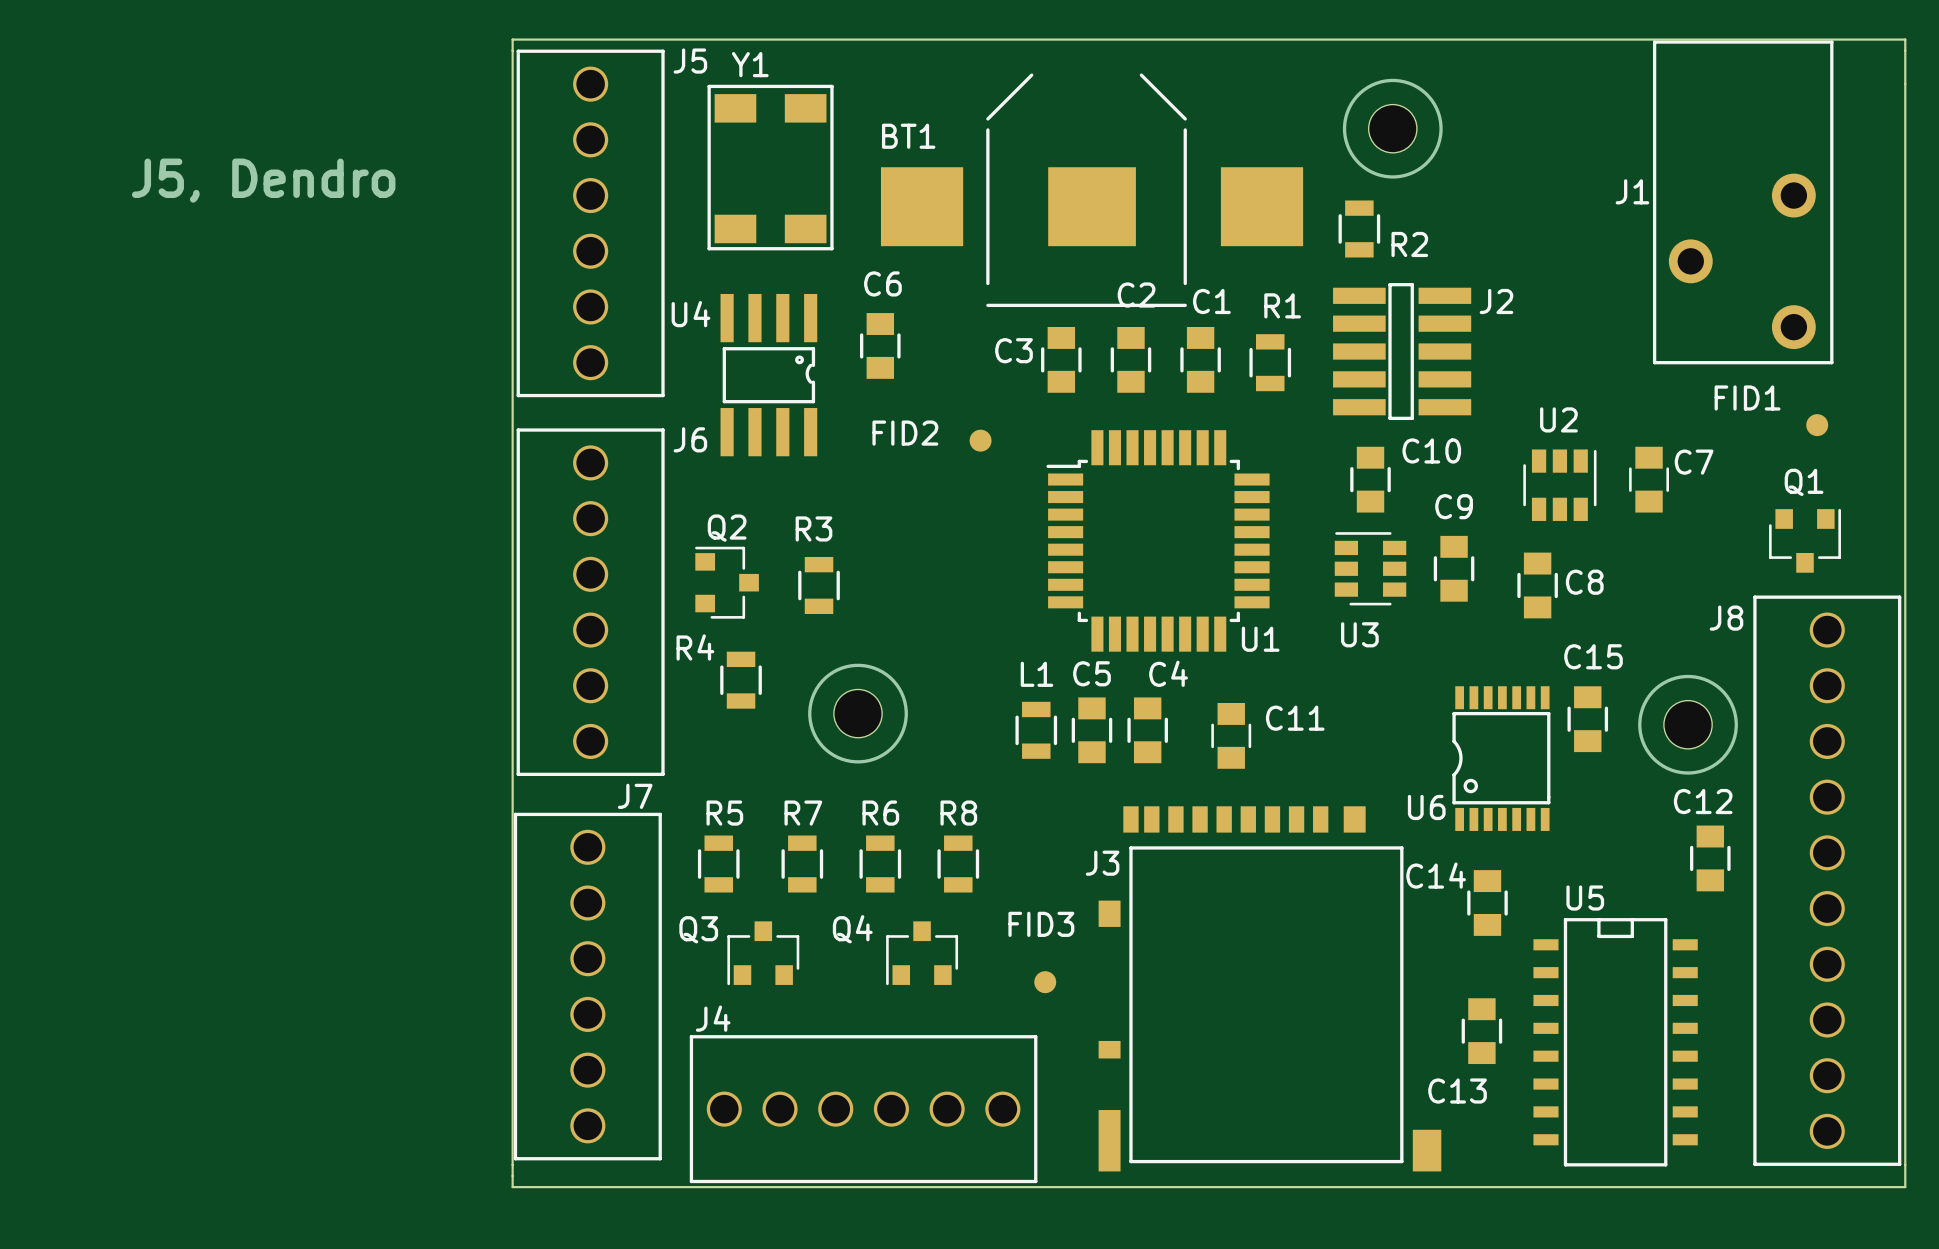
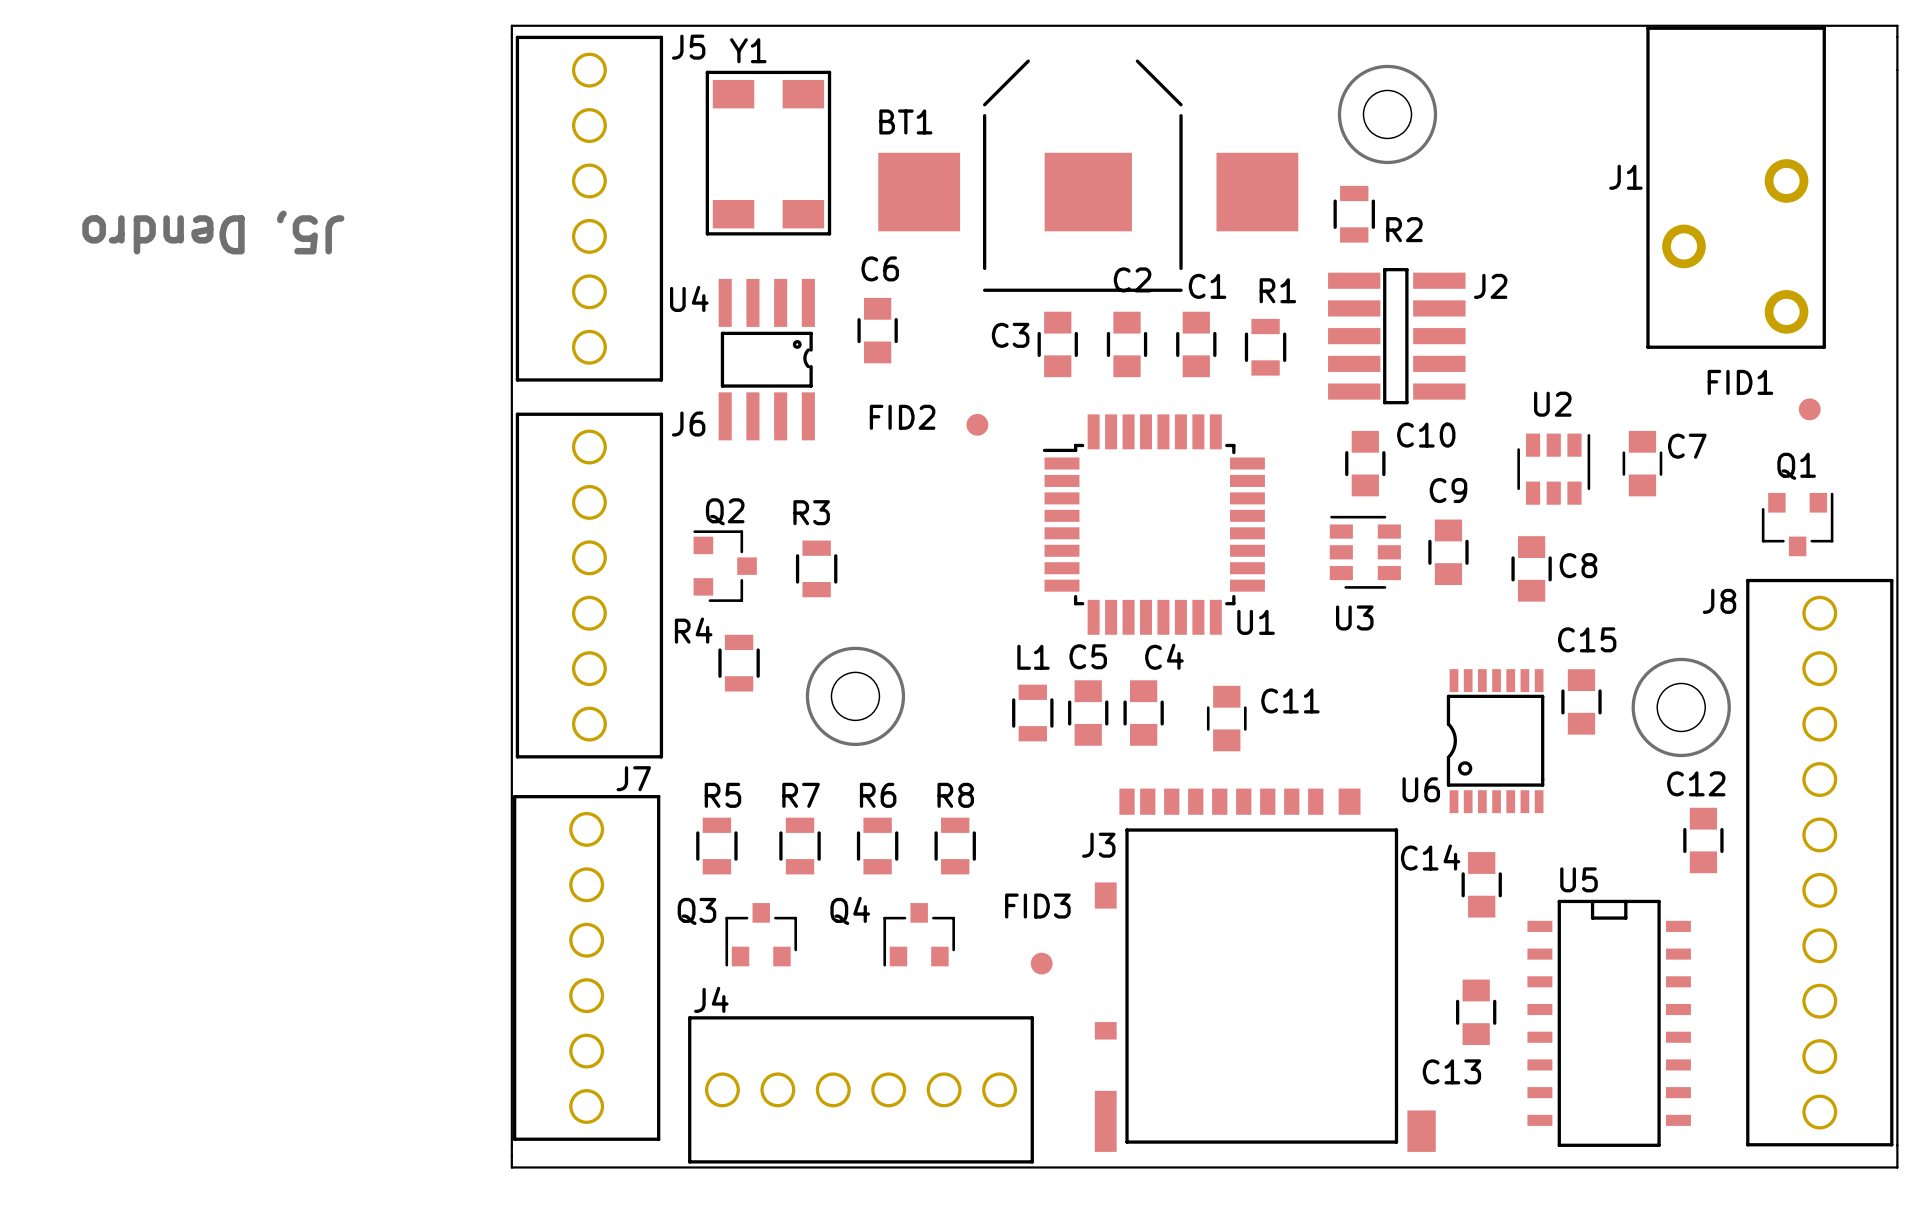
text rotation: 0° (263, 180) -> 180° (213, 232)

